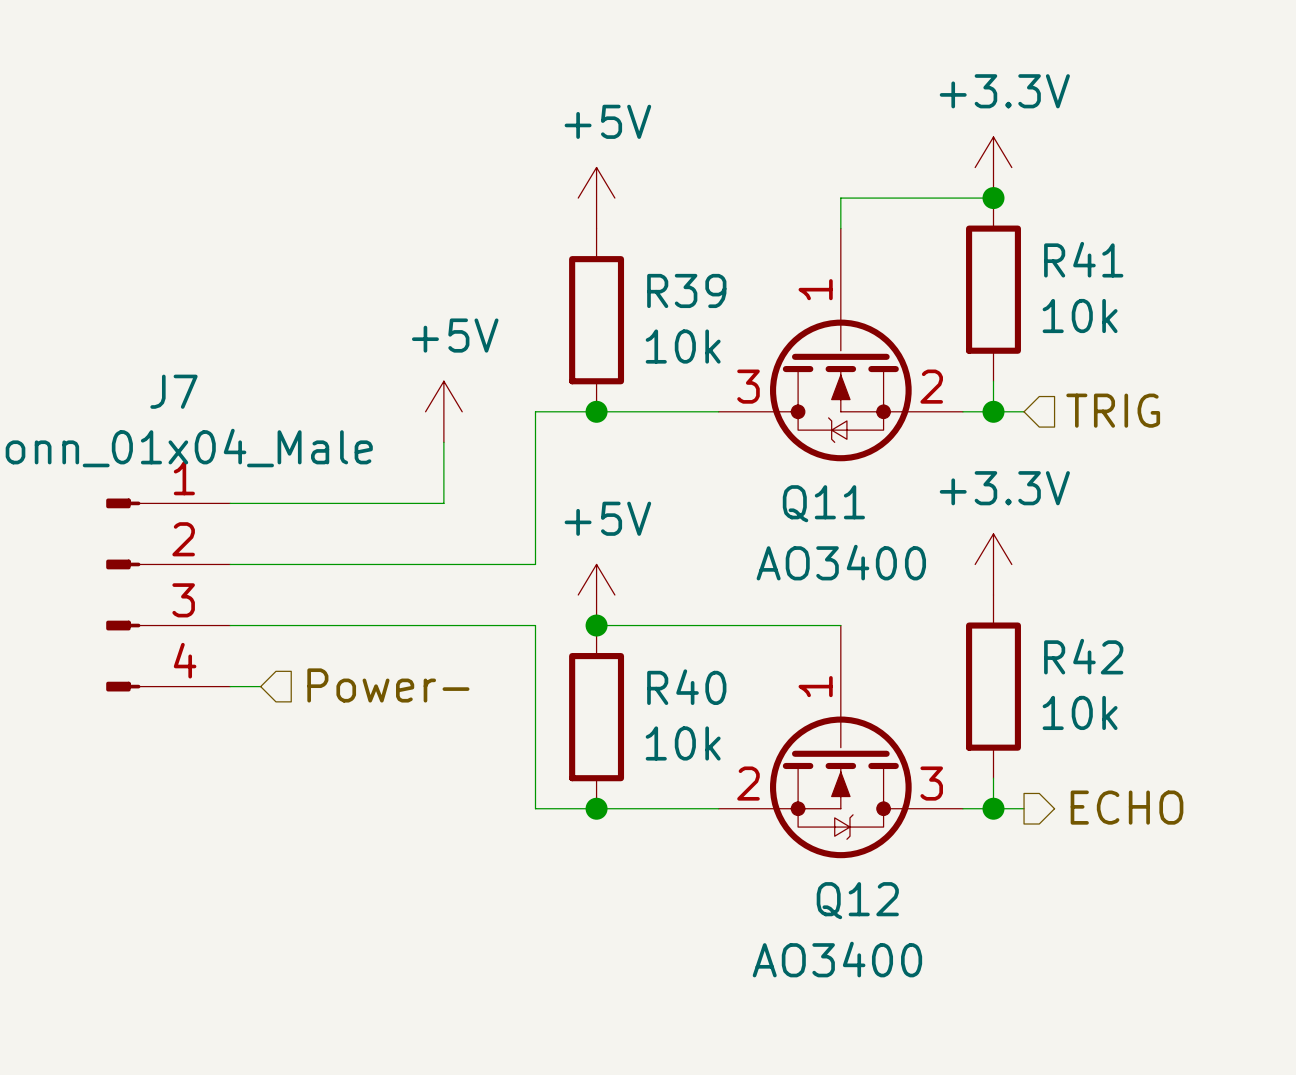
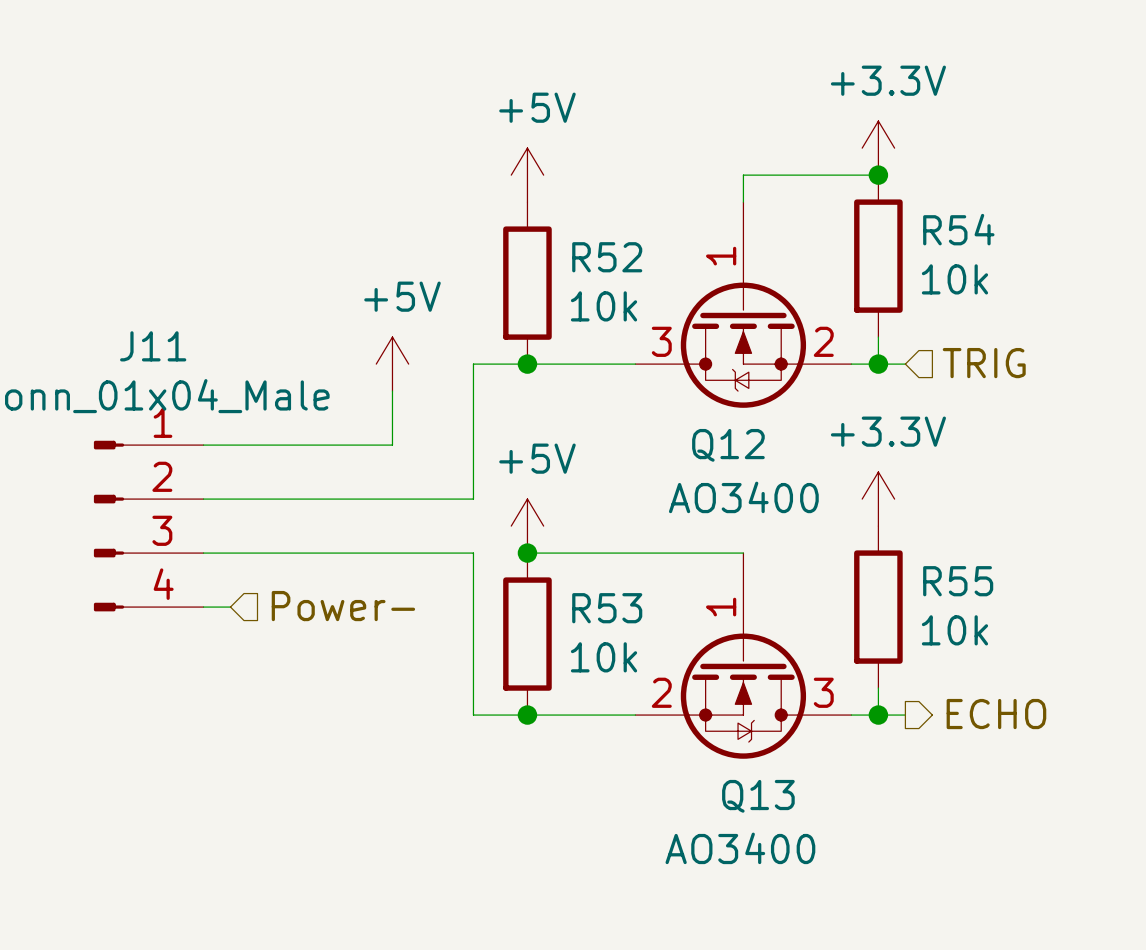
R41 name: R41 (1083, 259) -> R54 (958, 229)
R39 name: R39 (686, 290) -> R52 (607, 257)
J7 name: J7 (173, 391) -> J11 (153, 346)
Q11 name: Q11 (823, 503) -> Q12 (728, 445)
R42 name: R42 (1083, 656) -> R55 (958, 581)
R40 name: R40 (686, 687) -> R53 (607, 608)
Q12 name: Q12 (857, 900) -> Q13 (758, 796)

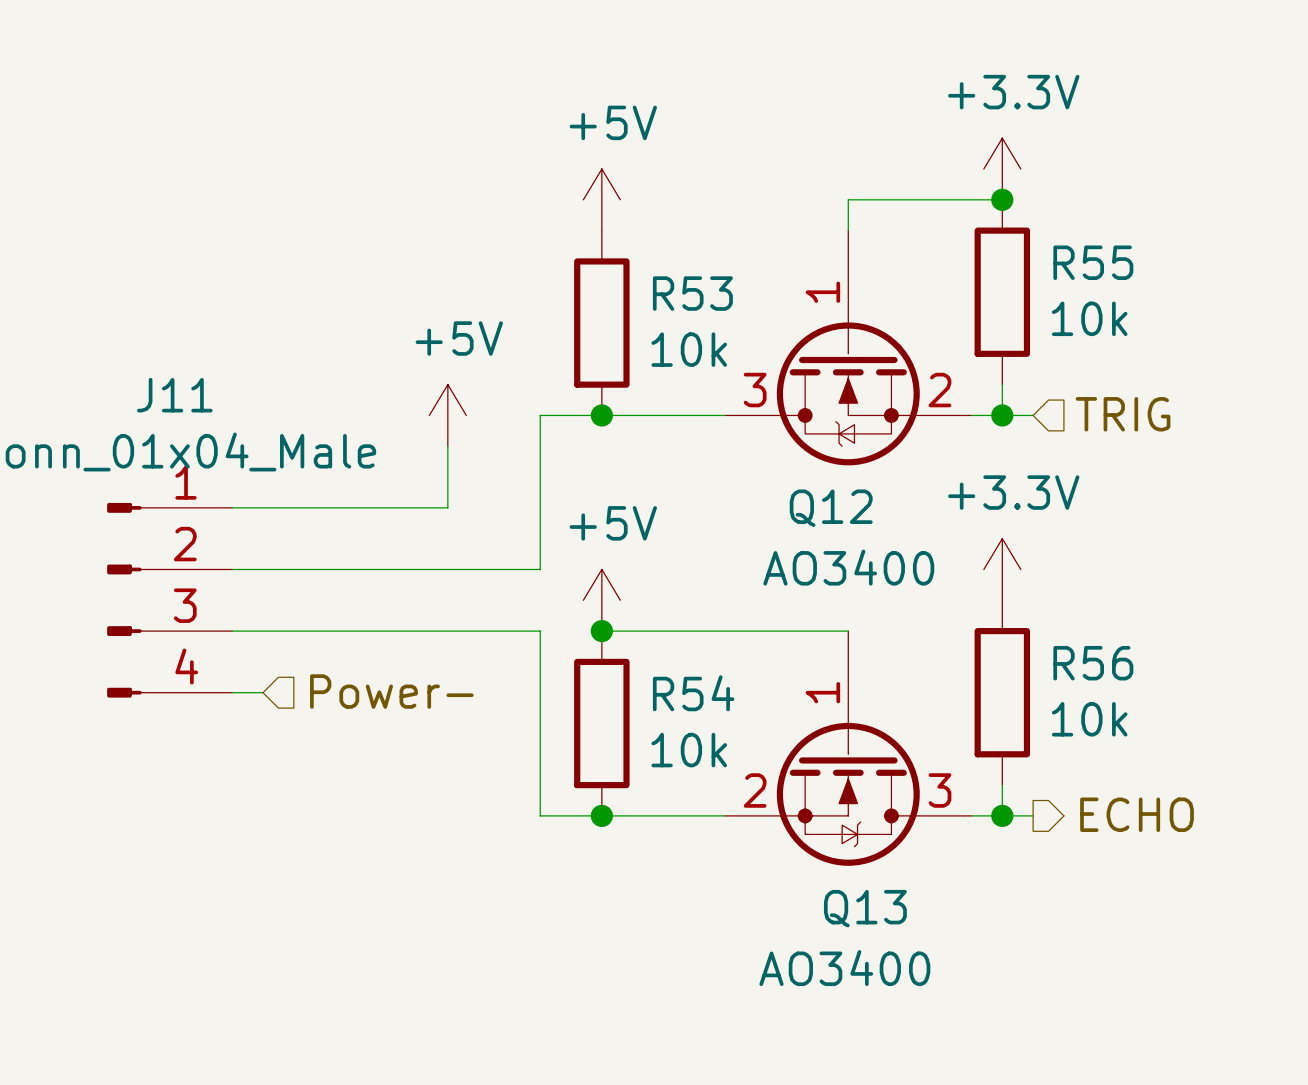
R54 name: R54 (958, 229) -> R55 (1093, 262)
R52 name: R52 (607, 257) -> R53 (692, 293)
R55 name: R55 (958, 581) -> R56 (1093, 663)
R53 name: R53 (607, 608) -> R54 (693, 693)

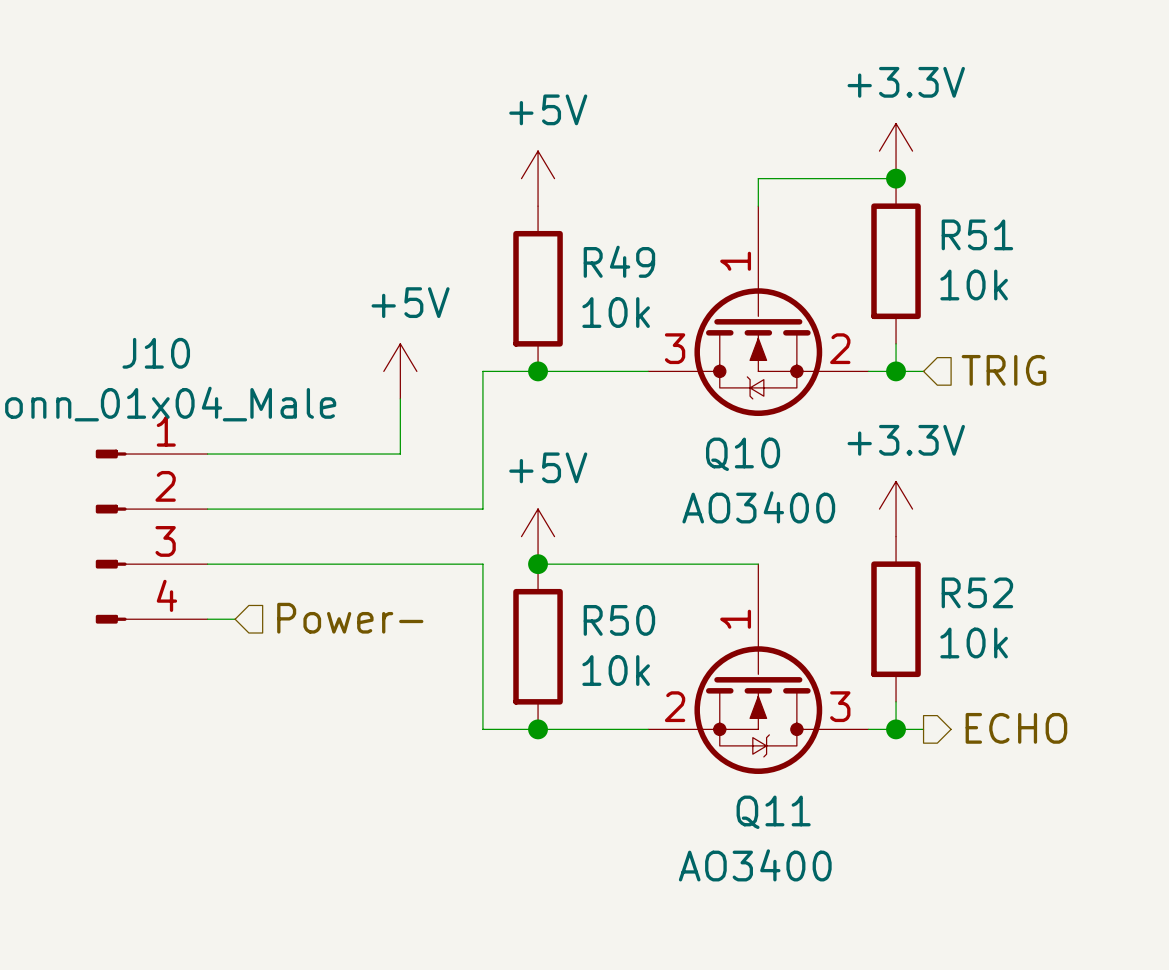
R55 name: R55 (1093, 262) -> R51 (977, 234)
R53 name: R53 (692, 293) -> R49 (619, 261)
J11 name: J11 (174, 395) -> J10 (156, 353)
Q12 name: Q12 (831, 508) -> Q10 (743, 454)
R56 name: R56 (1093, 663) -> R52 (977, 592)
R54 name: R54 (693, 693) -> R50 (619, 620)
Q13 name: Q13 (865, 908) -> Q11 (773, 812)

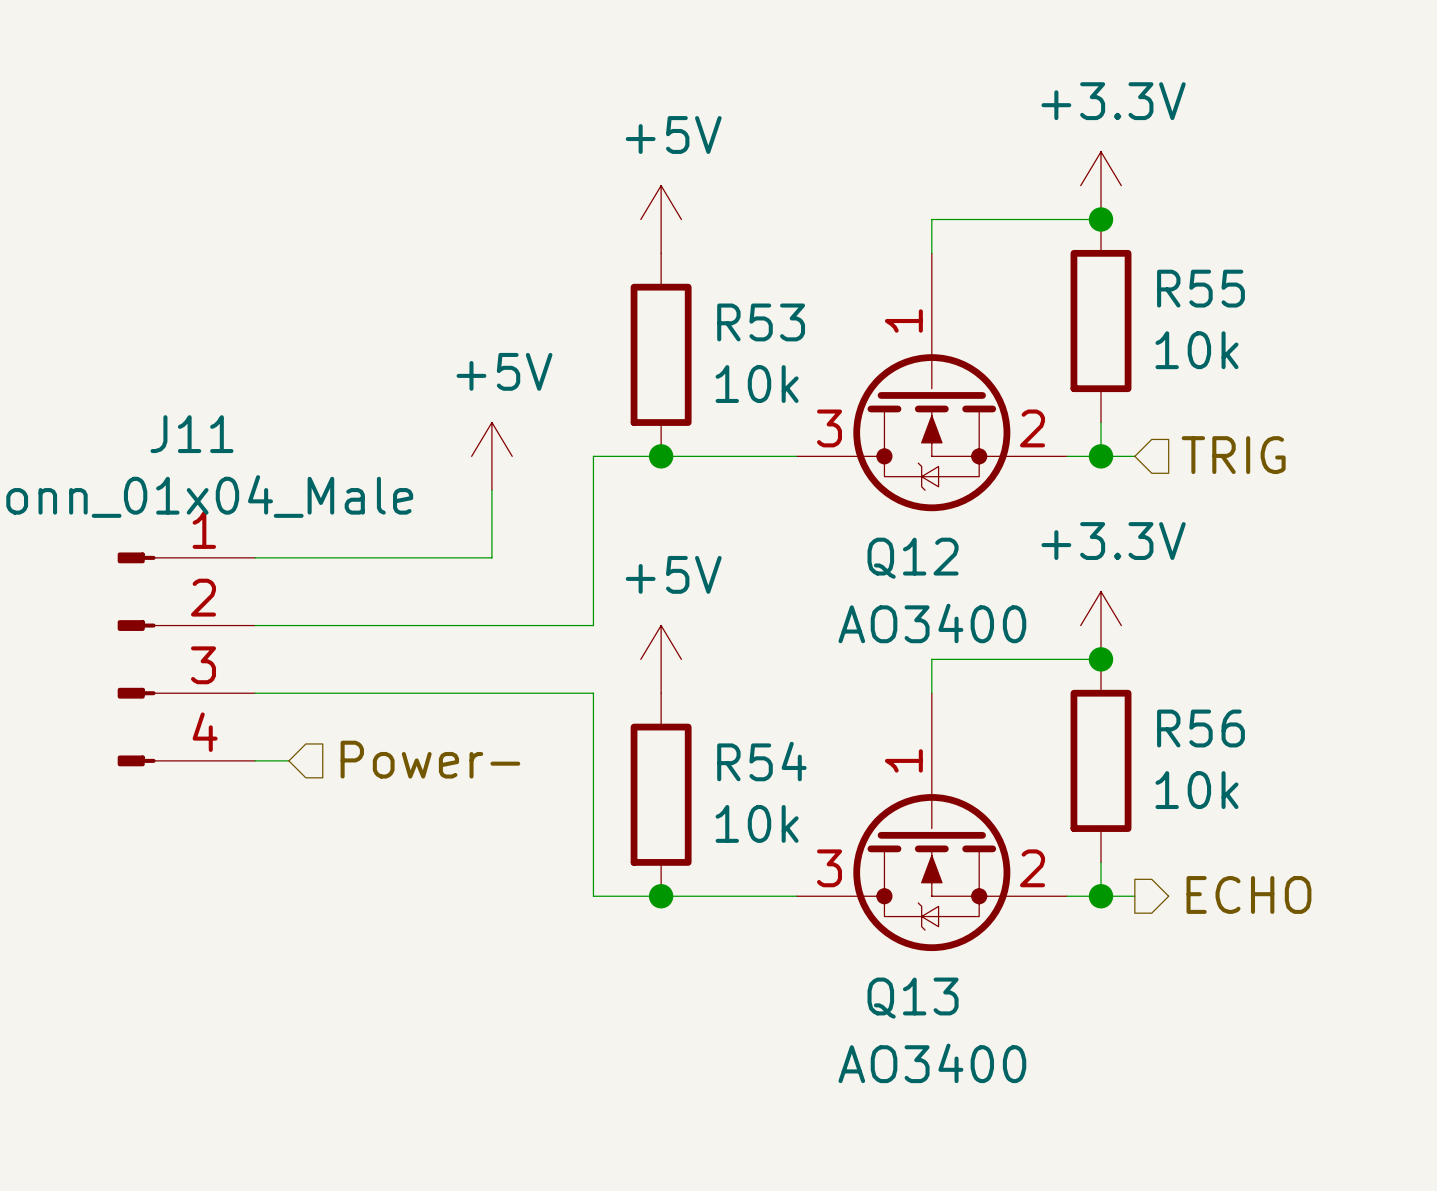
R51 name: R51 (977, 234) -> R55 (1200, 288)
R49 name: R49 (619, 261) -> R53 (761, 322)
J10 name: J10 (156, 353) -> J11 (192, 434)
Q10 name: Q10 (743, 454) -> Q12 (913, 558)
junction: none -> (1101, 659)
wire: (538, 564) (758, 564) -> (1101, 659) (931, 659) (931, 693)
junction: (538, 564) -> none
R52 name: R52 (977, 592) -> R56 (1200, 728)
R50 name: R50 (619, 620) -> R54 (761, 761)
Q11: AO3400 (758, 669) -> none
Q13: none -> AO3400 (931, 822)

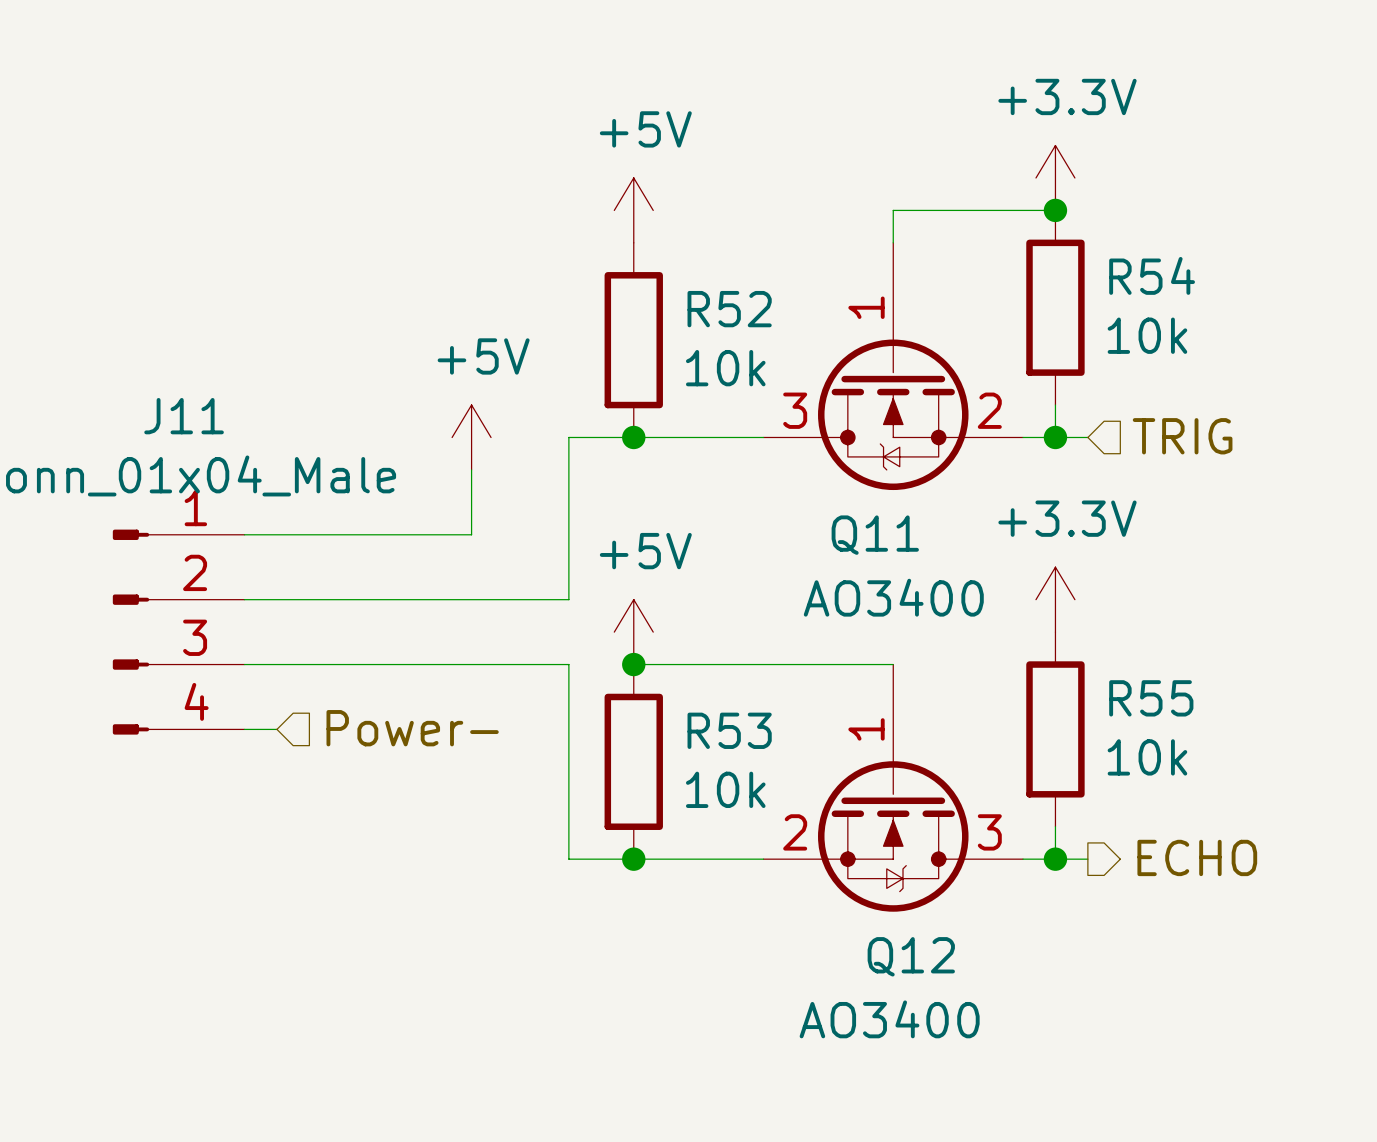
R55 name: R55 (1200, 288) -> R54 (1152, 275)
R53 name: R53 (761, 322) -> R52 (729, 309)
Q12 name: Q12 (913, 558) -> Q11 (875, 535)
wire: (1101, 659) (931, 659) (931, 693) -> (633, 664) (893, 664)
junction: (1101, 659) -> none
junction: none -> (633, 664)
R56 name: R56 (1200, 728) -> R55 (1151, 698)
R54 name: R54 (761, 761) -> R53 (729, 730)
Q13: AO3400 (931, 822) -> none
Q12: none -> AO3400 (893, 788)

